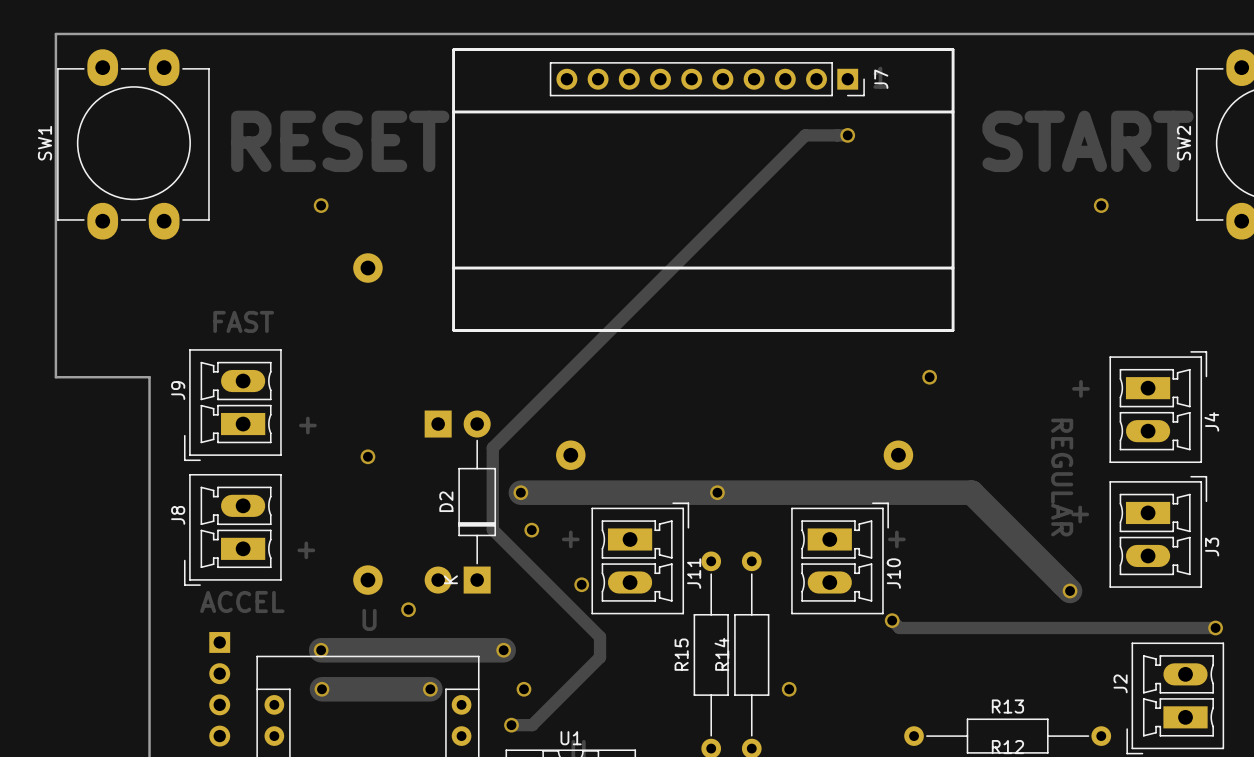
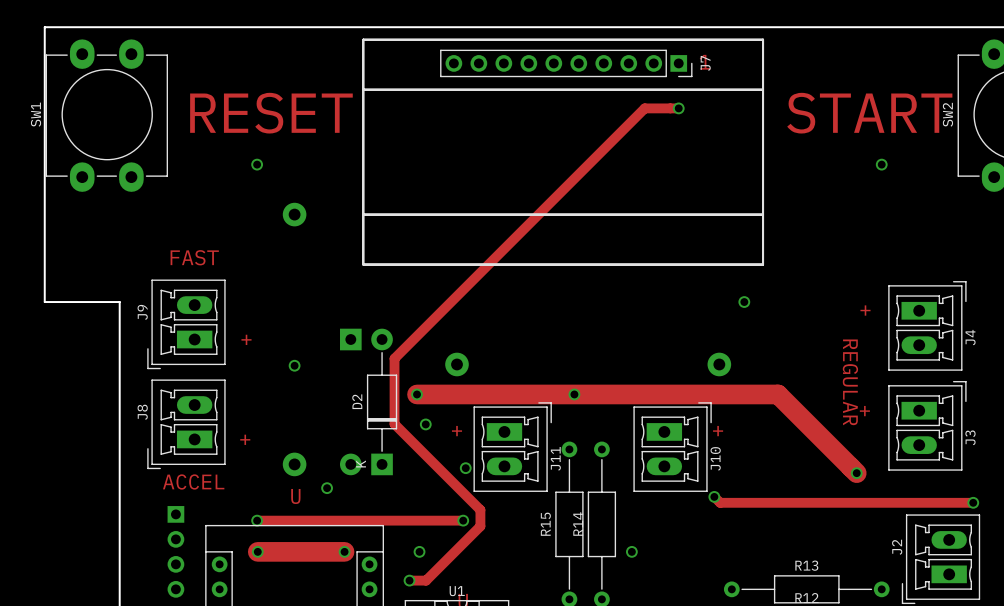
track width: thick (321, 650) (503, 650) -> thin (257, 520) (403, 520)
track: none -> (403, 520) (463, 520)
via: (503, 650) -> none
via: none -> (463, 520)

